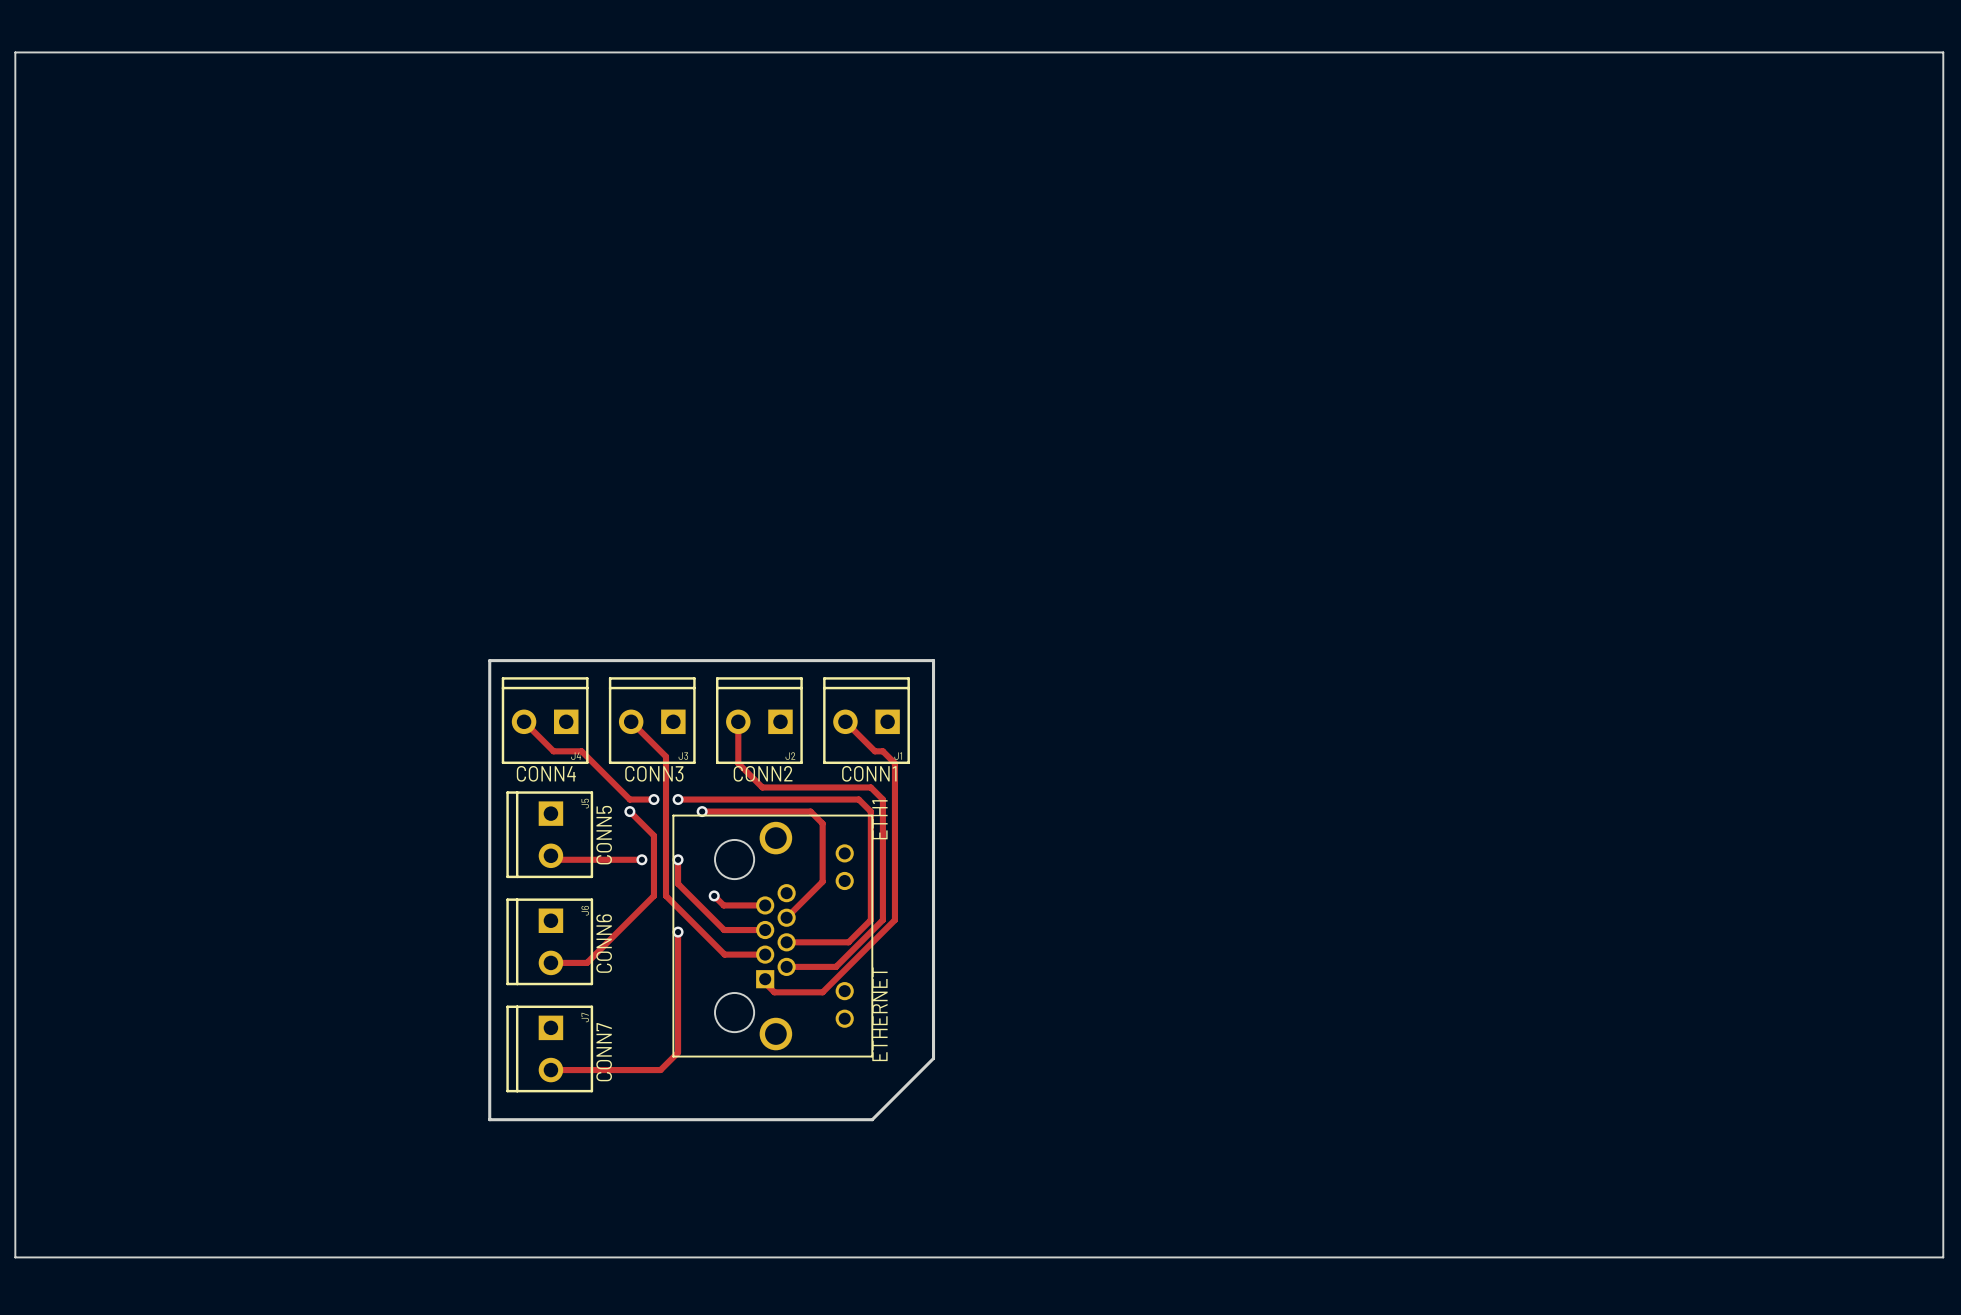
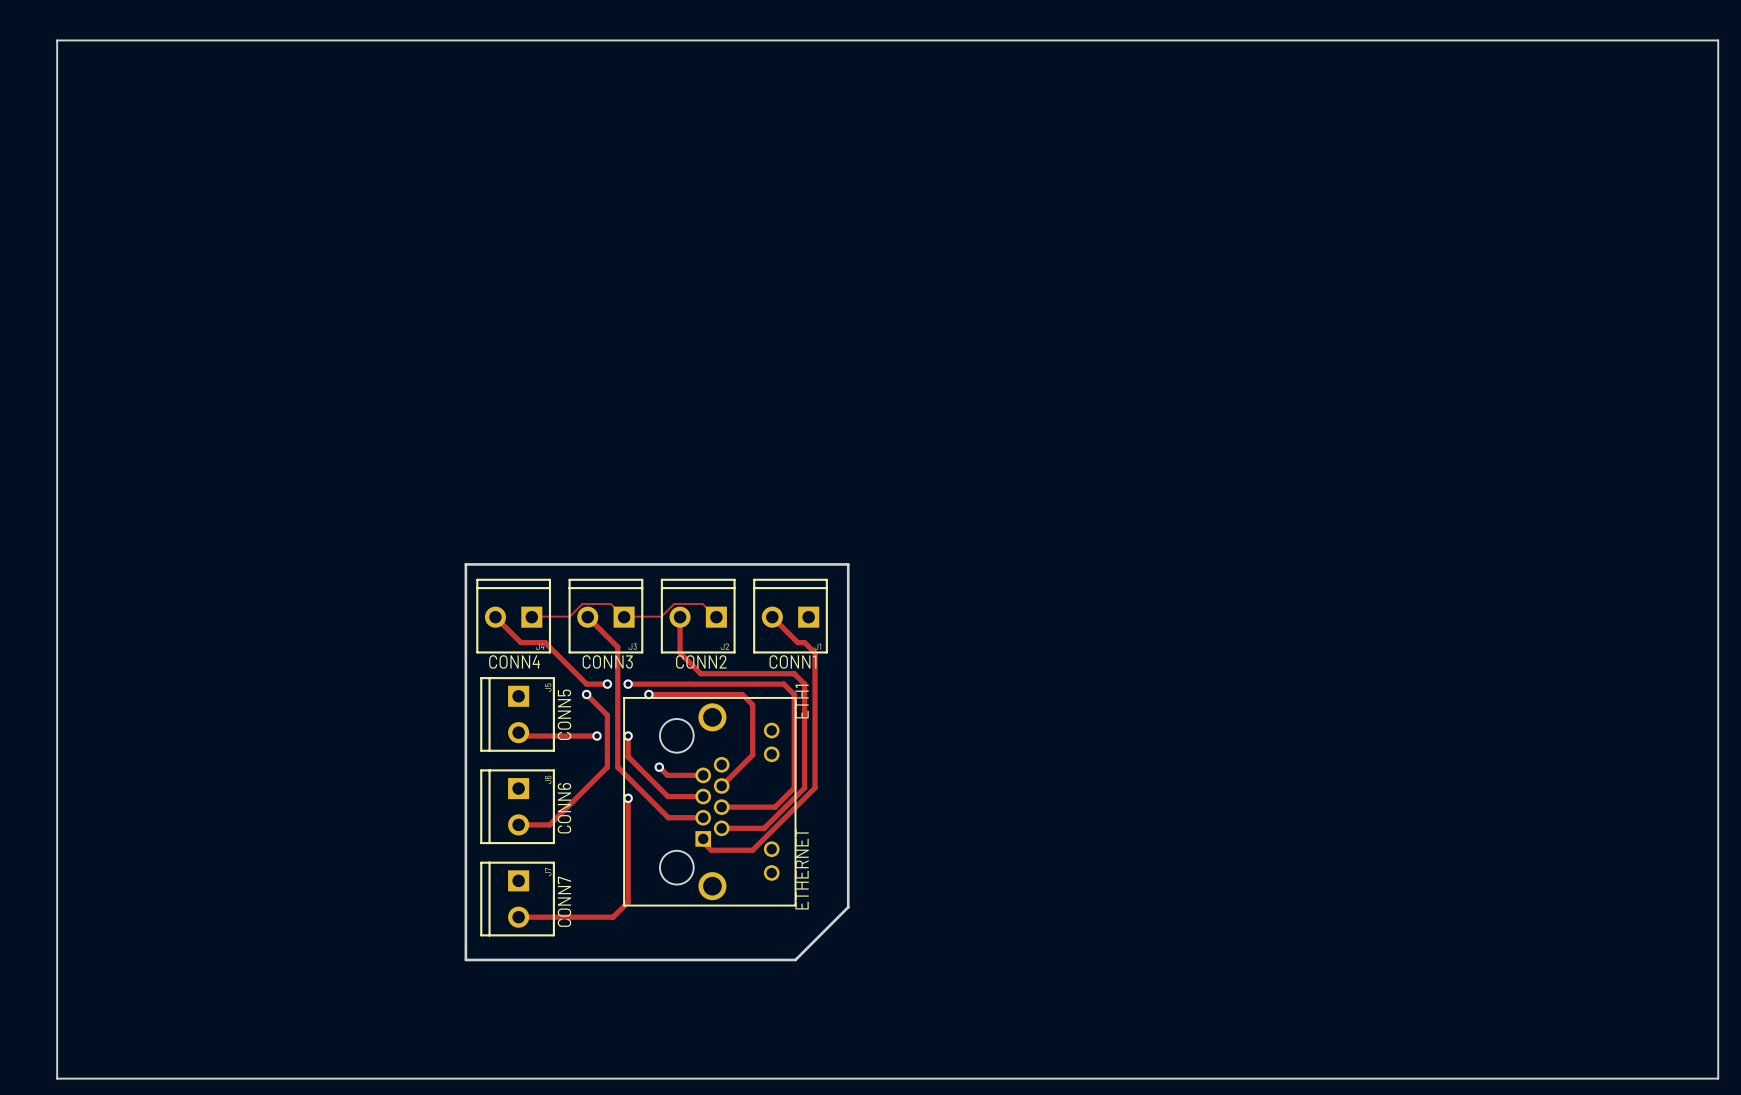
track: none -> (531, 617) (569, 616) (582, 603) (610, 603) (624, 617) (661, 616) (674, 603) (702, 603) (716, 617)

